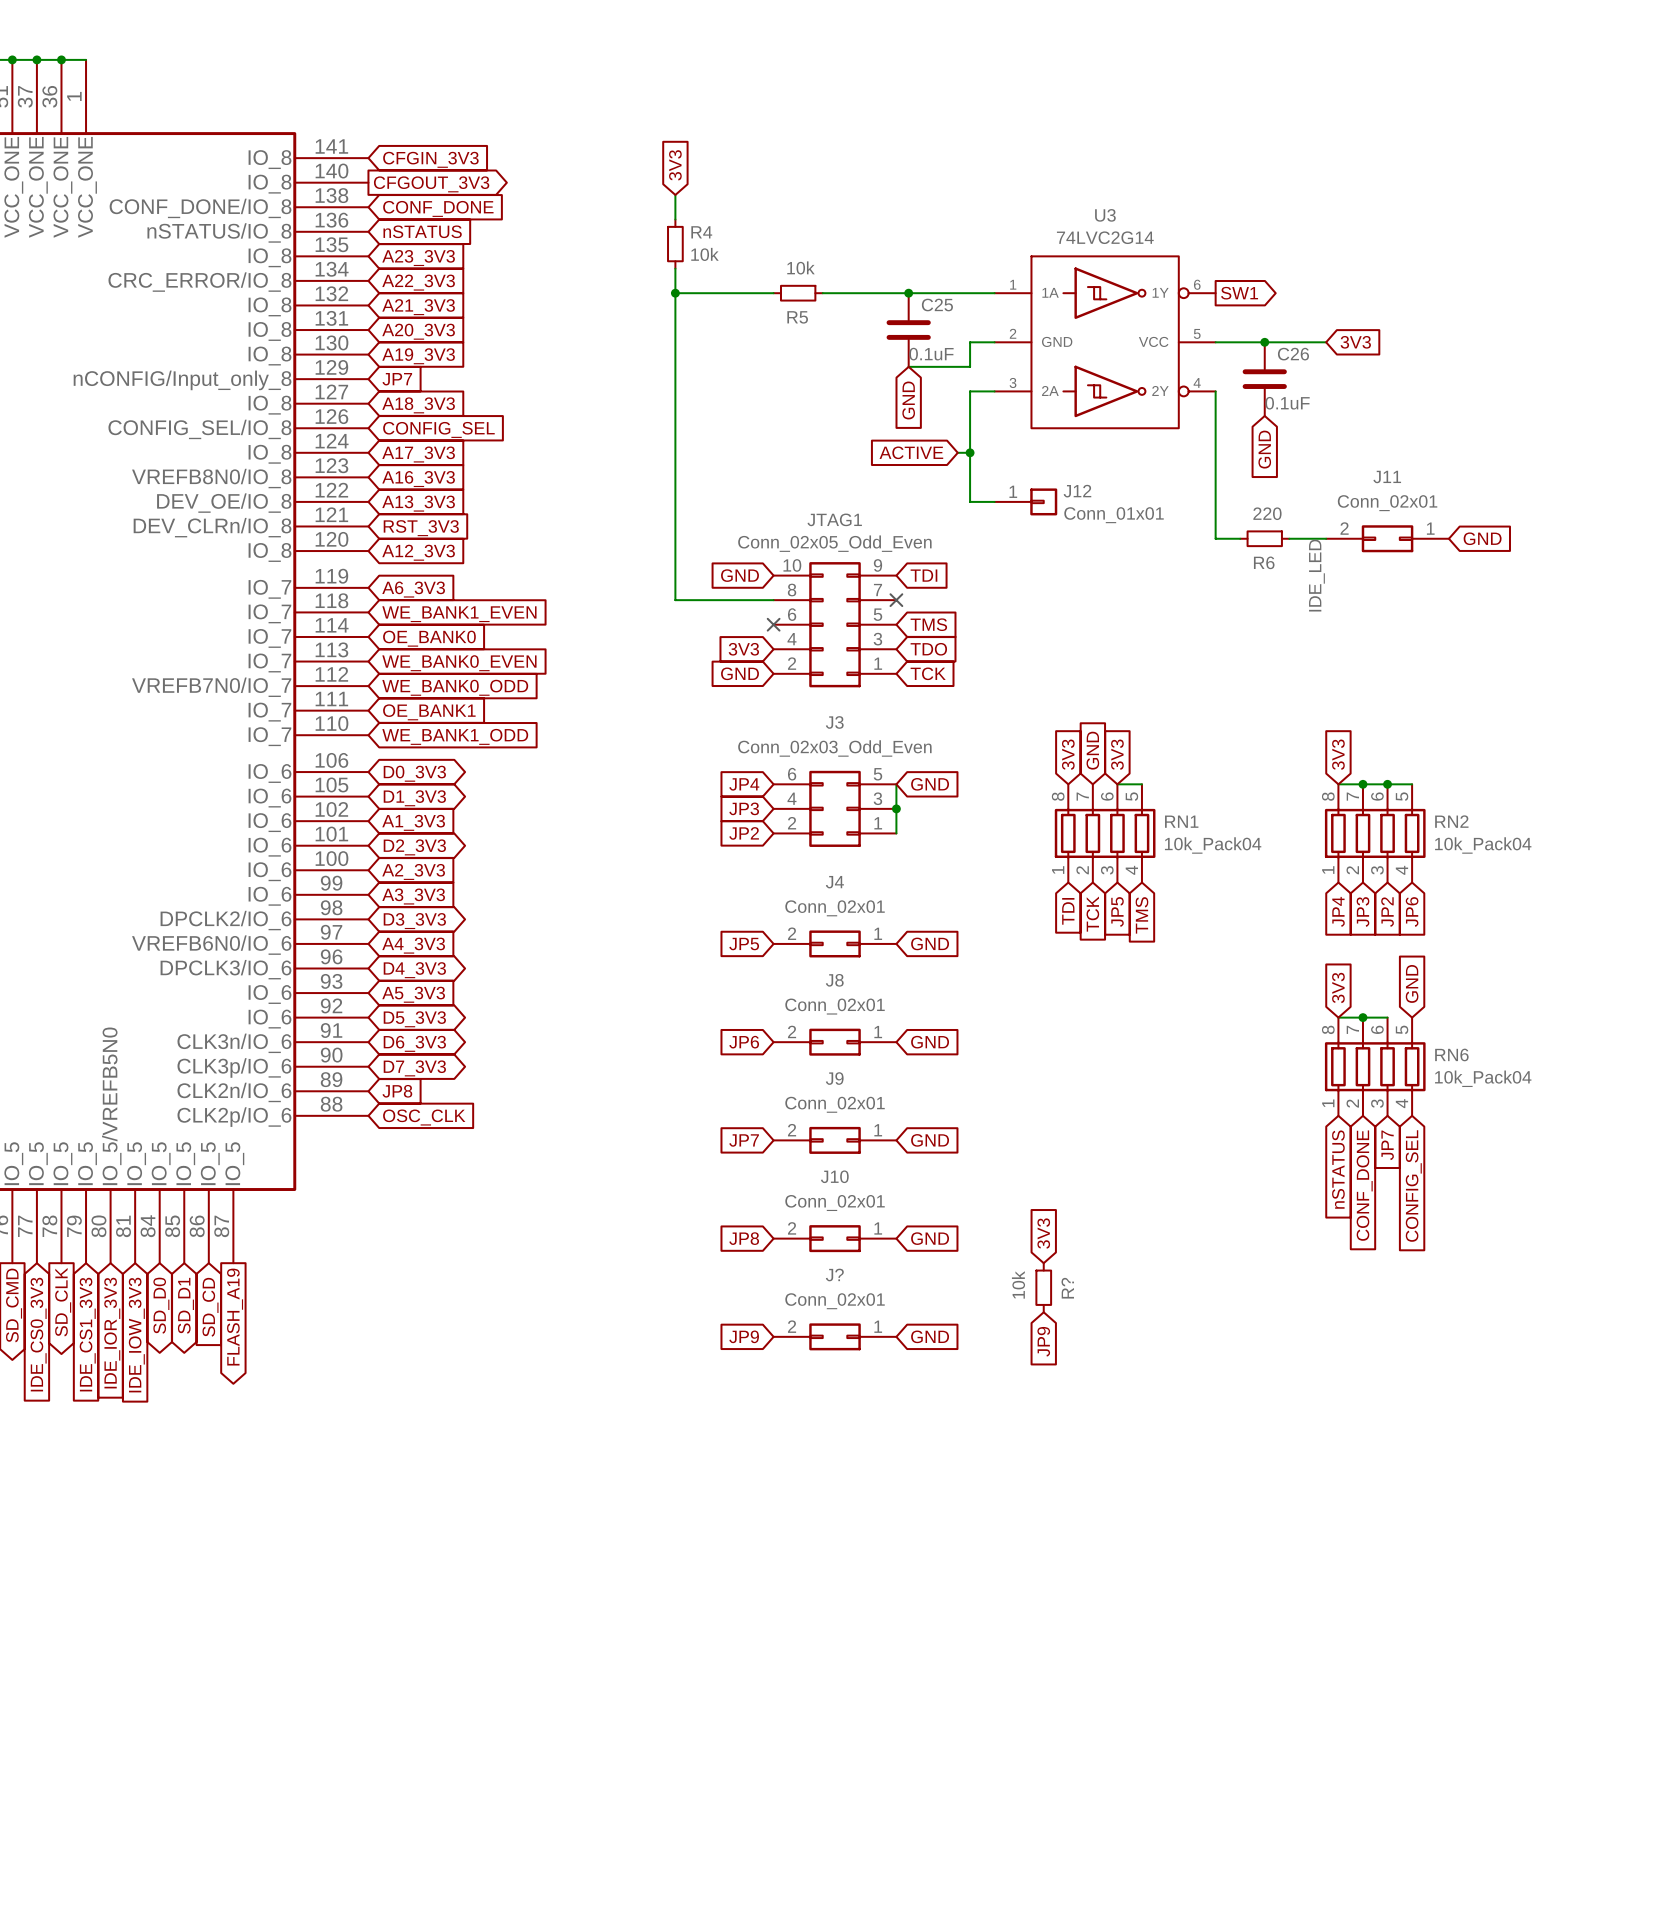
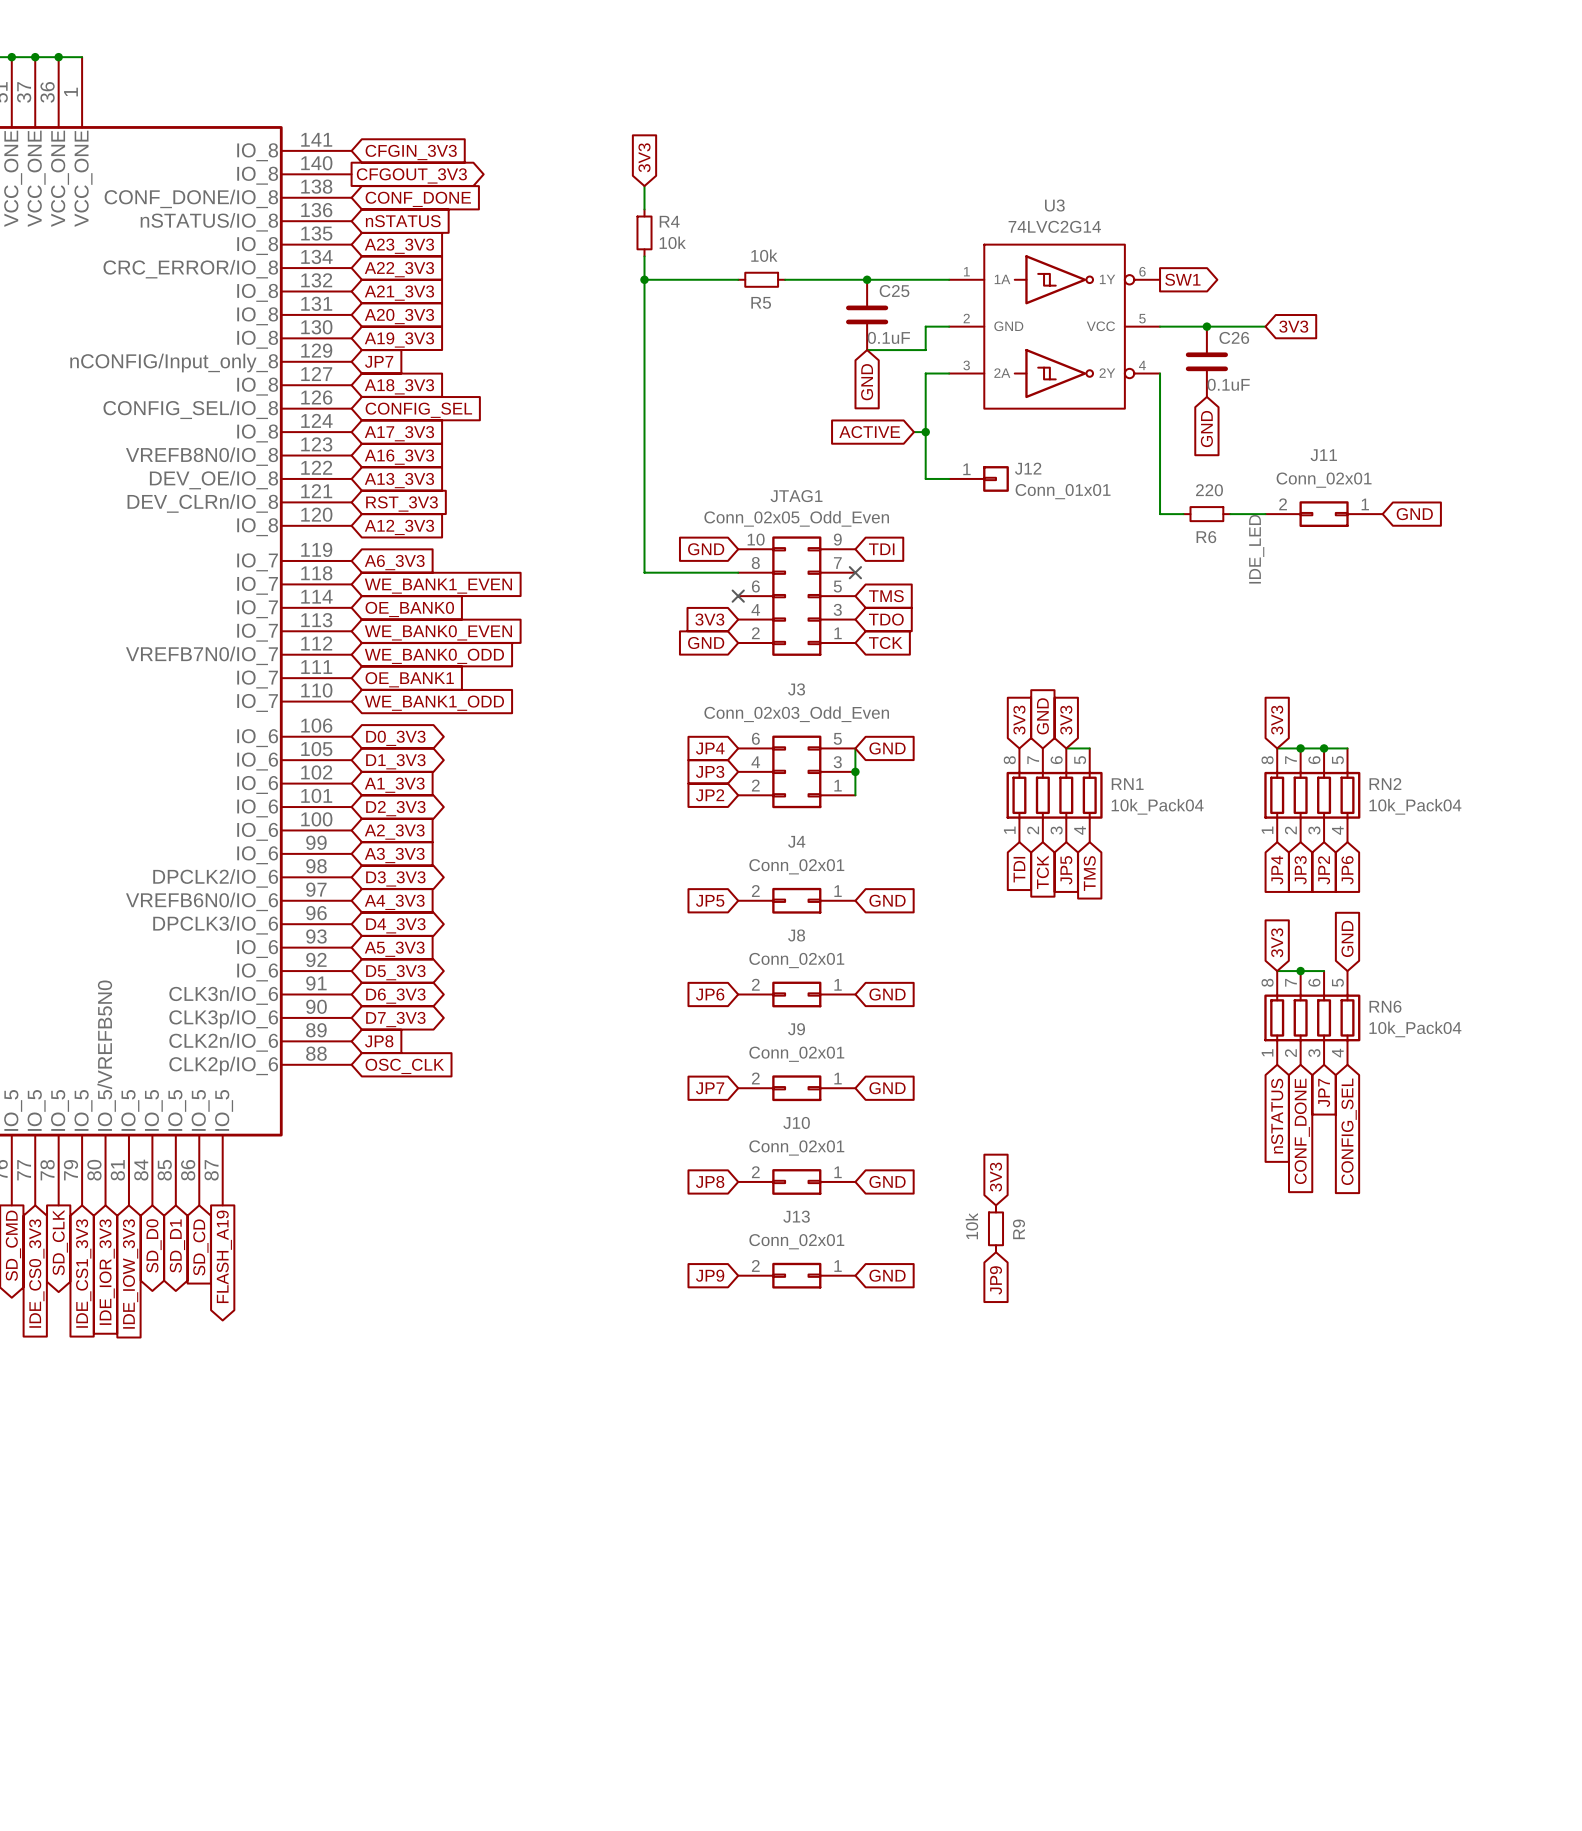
J? name: J? (834, 1274) -> J13 (796, 1216)
R? name: R? (1067, 1288) -> R9 (1018, 1229)

